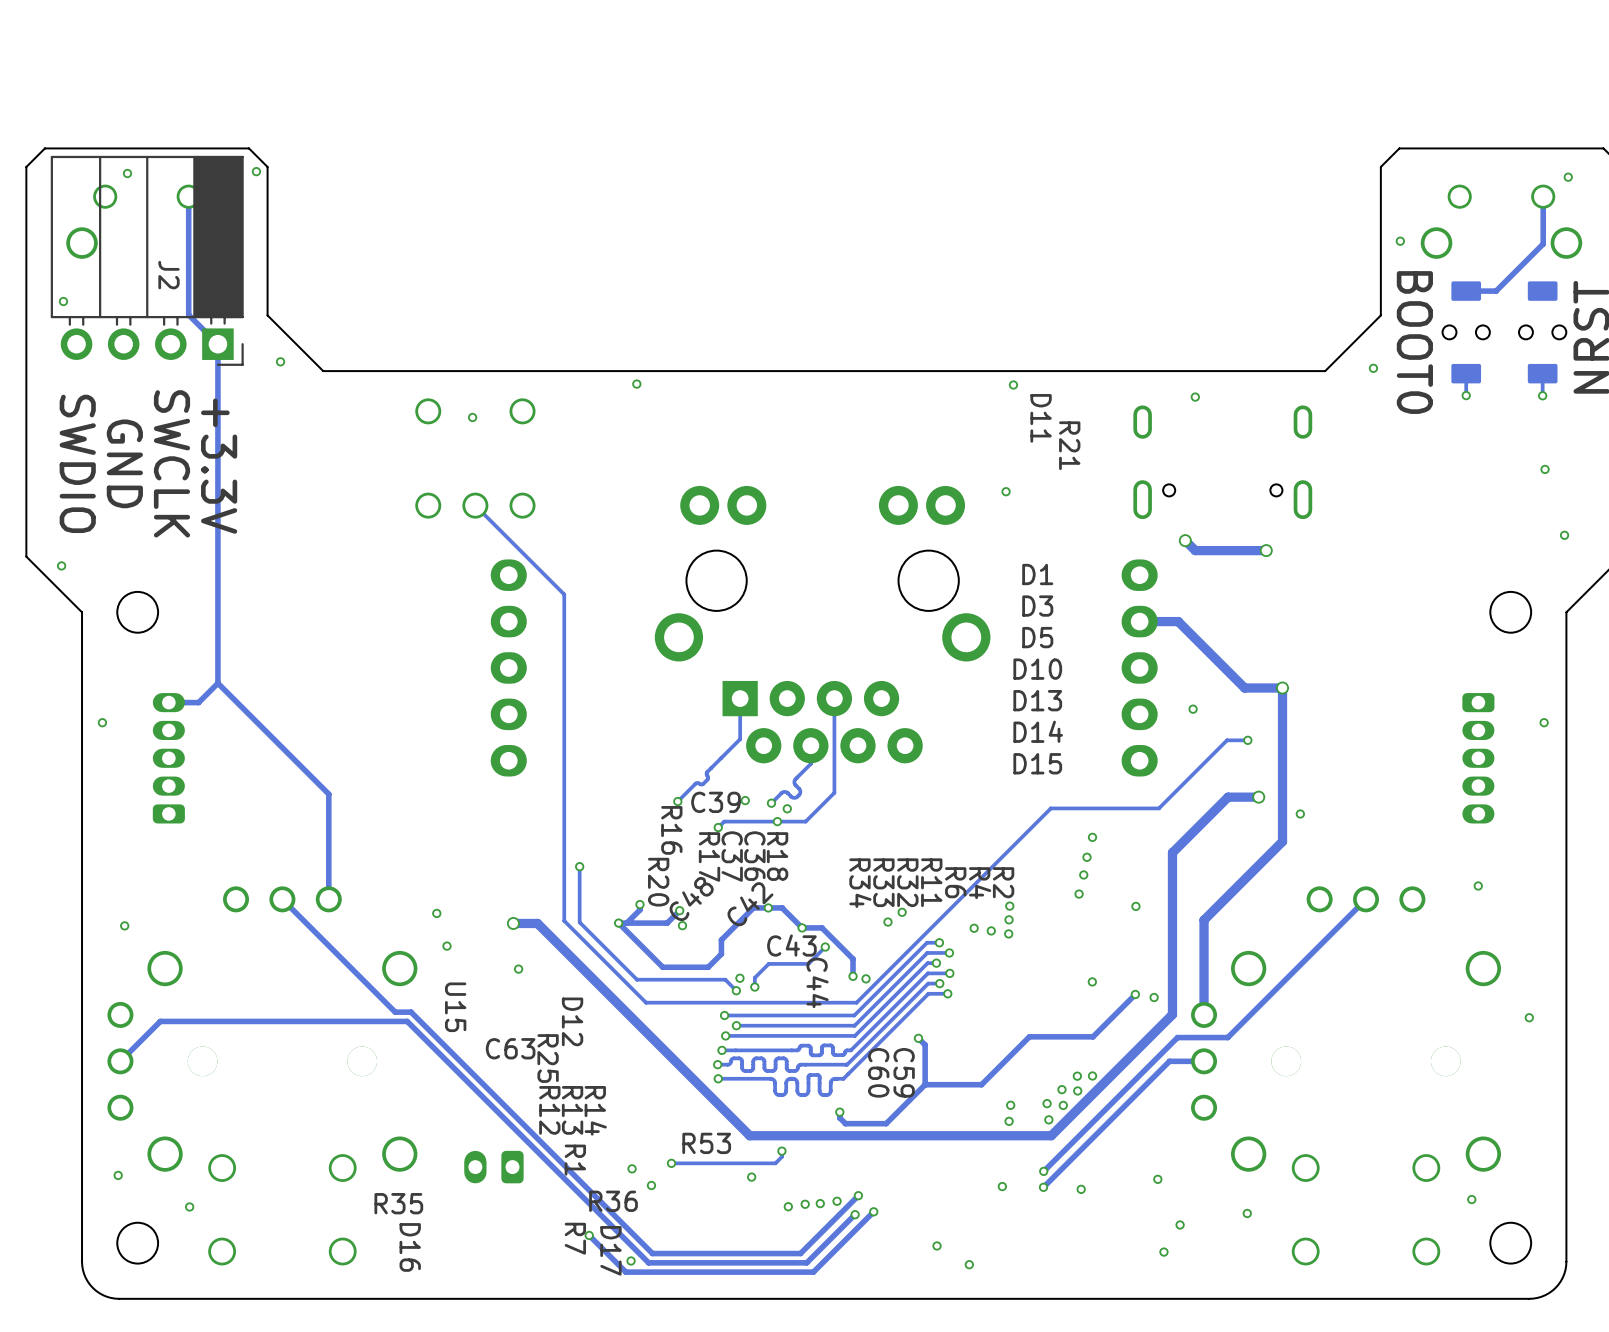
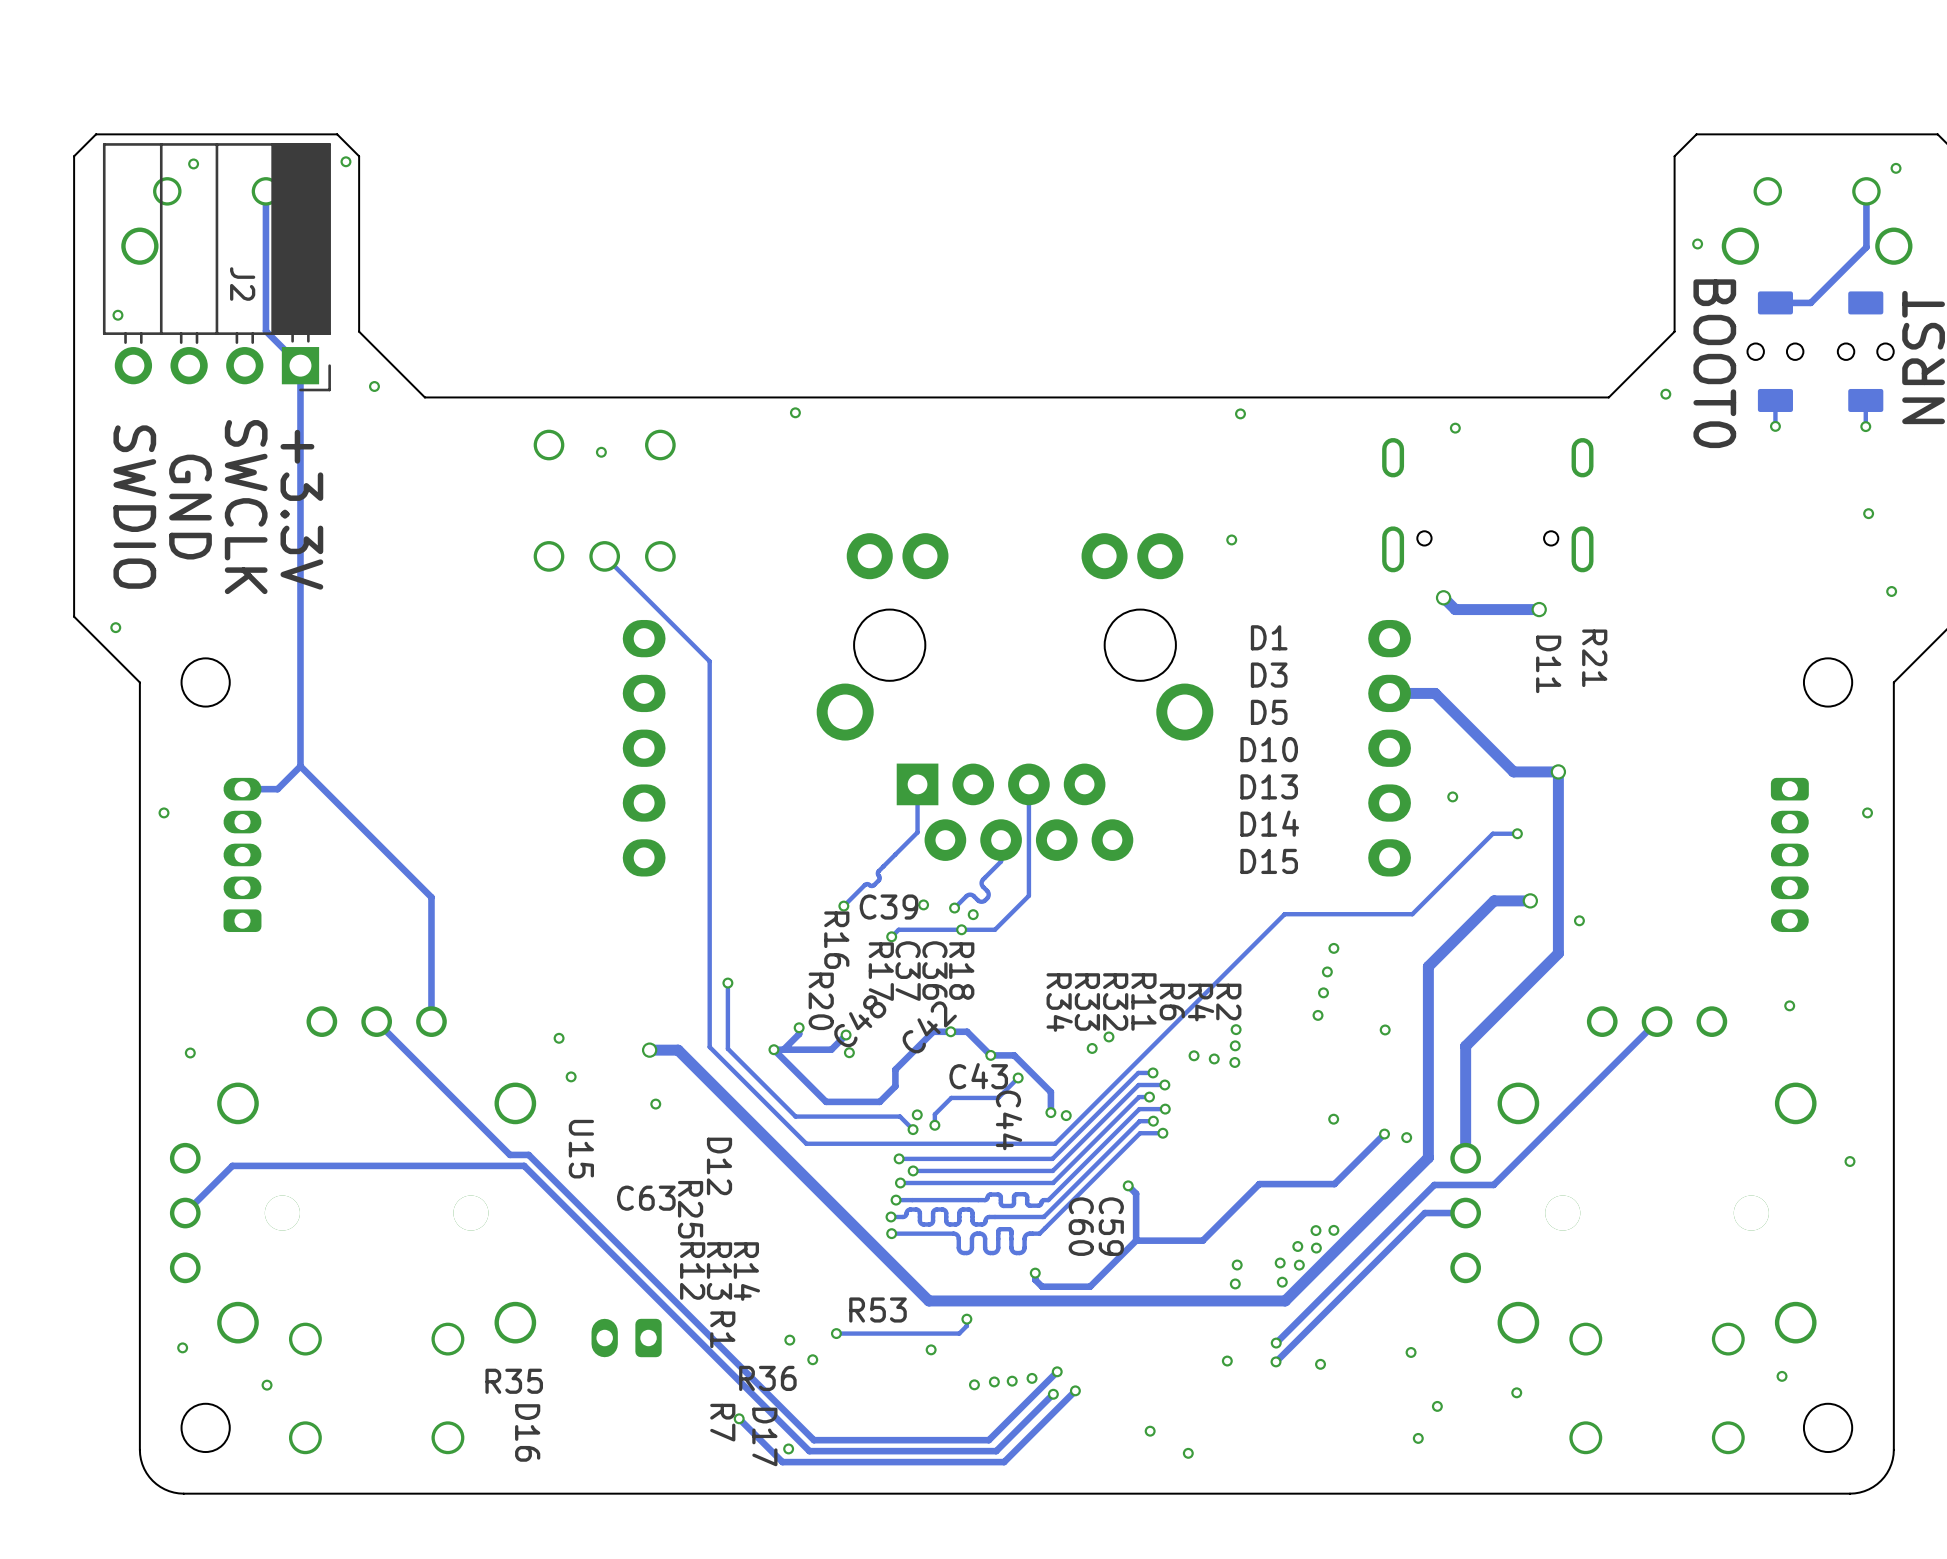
D11 position: (1041, 418) -> (1548, 664)
R21 position: (1069, 445) -> (1594, 658)

